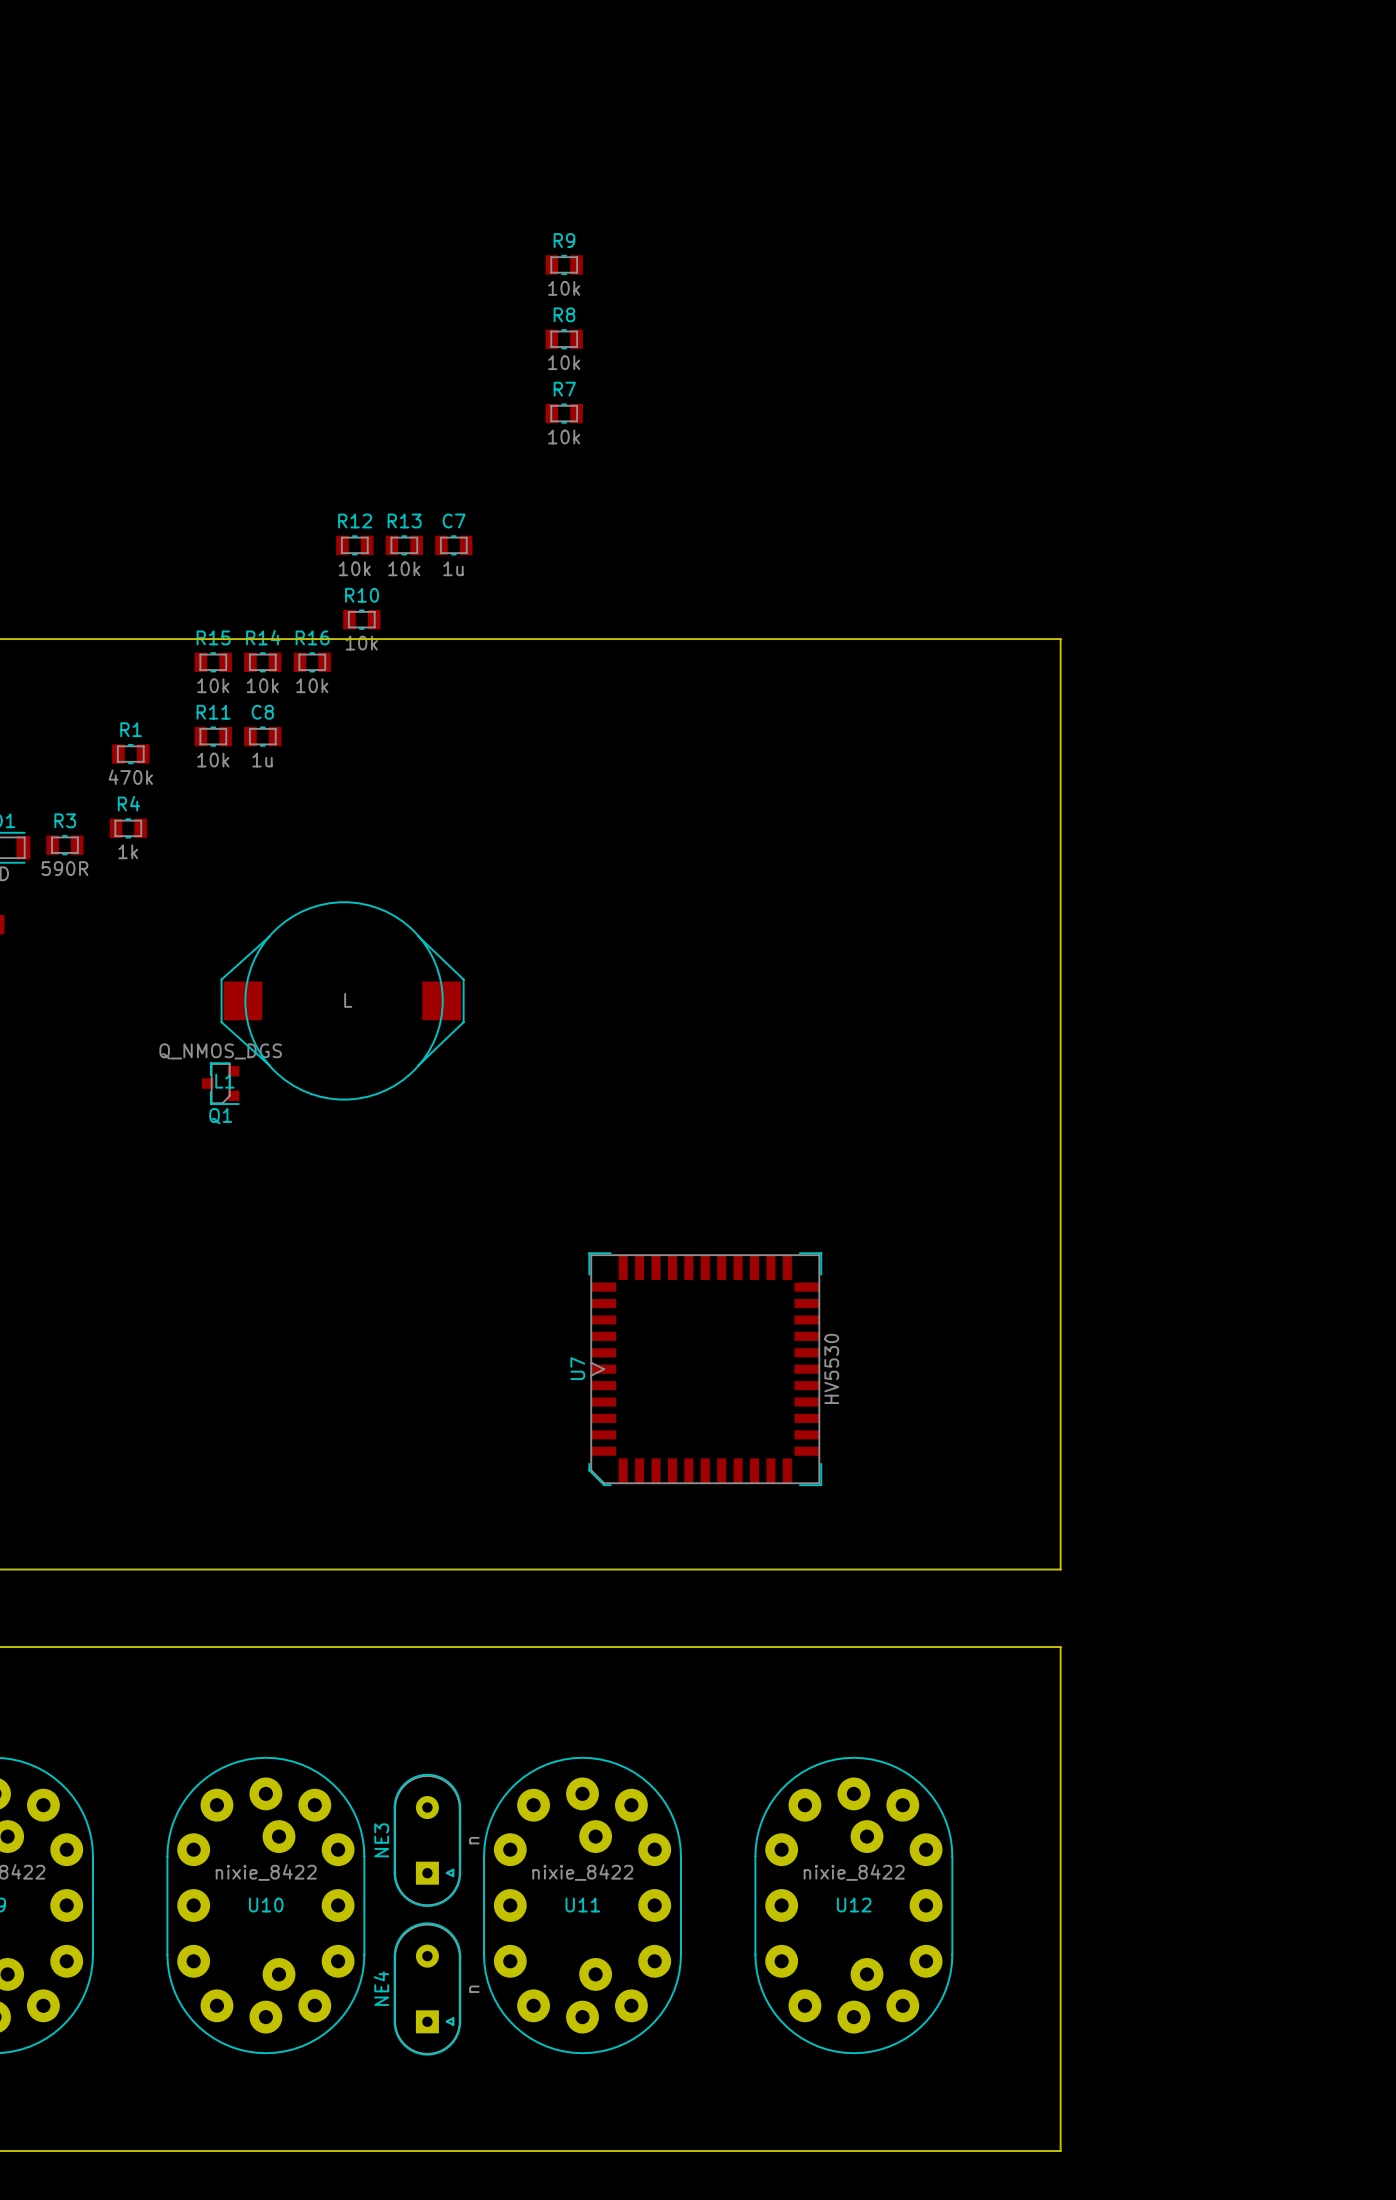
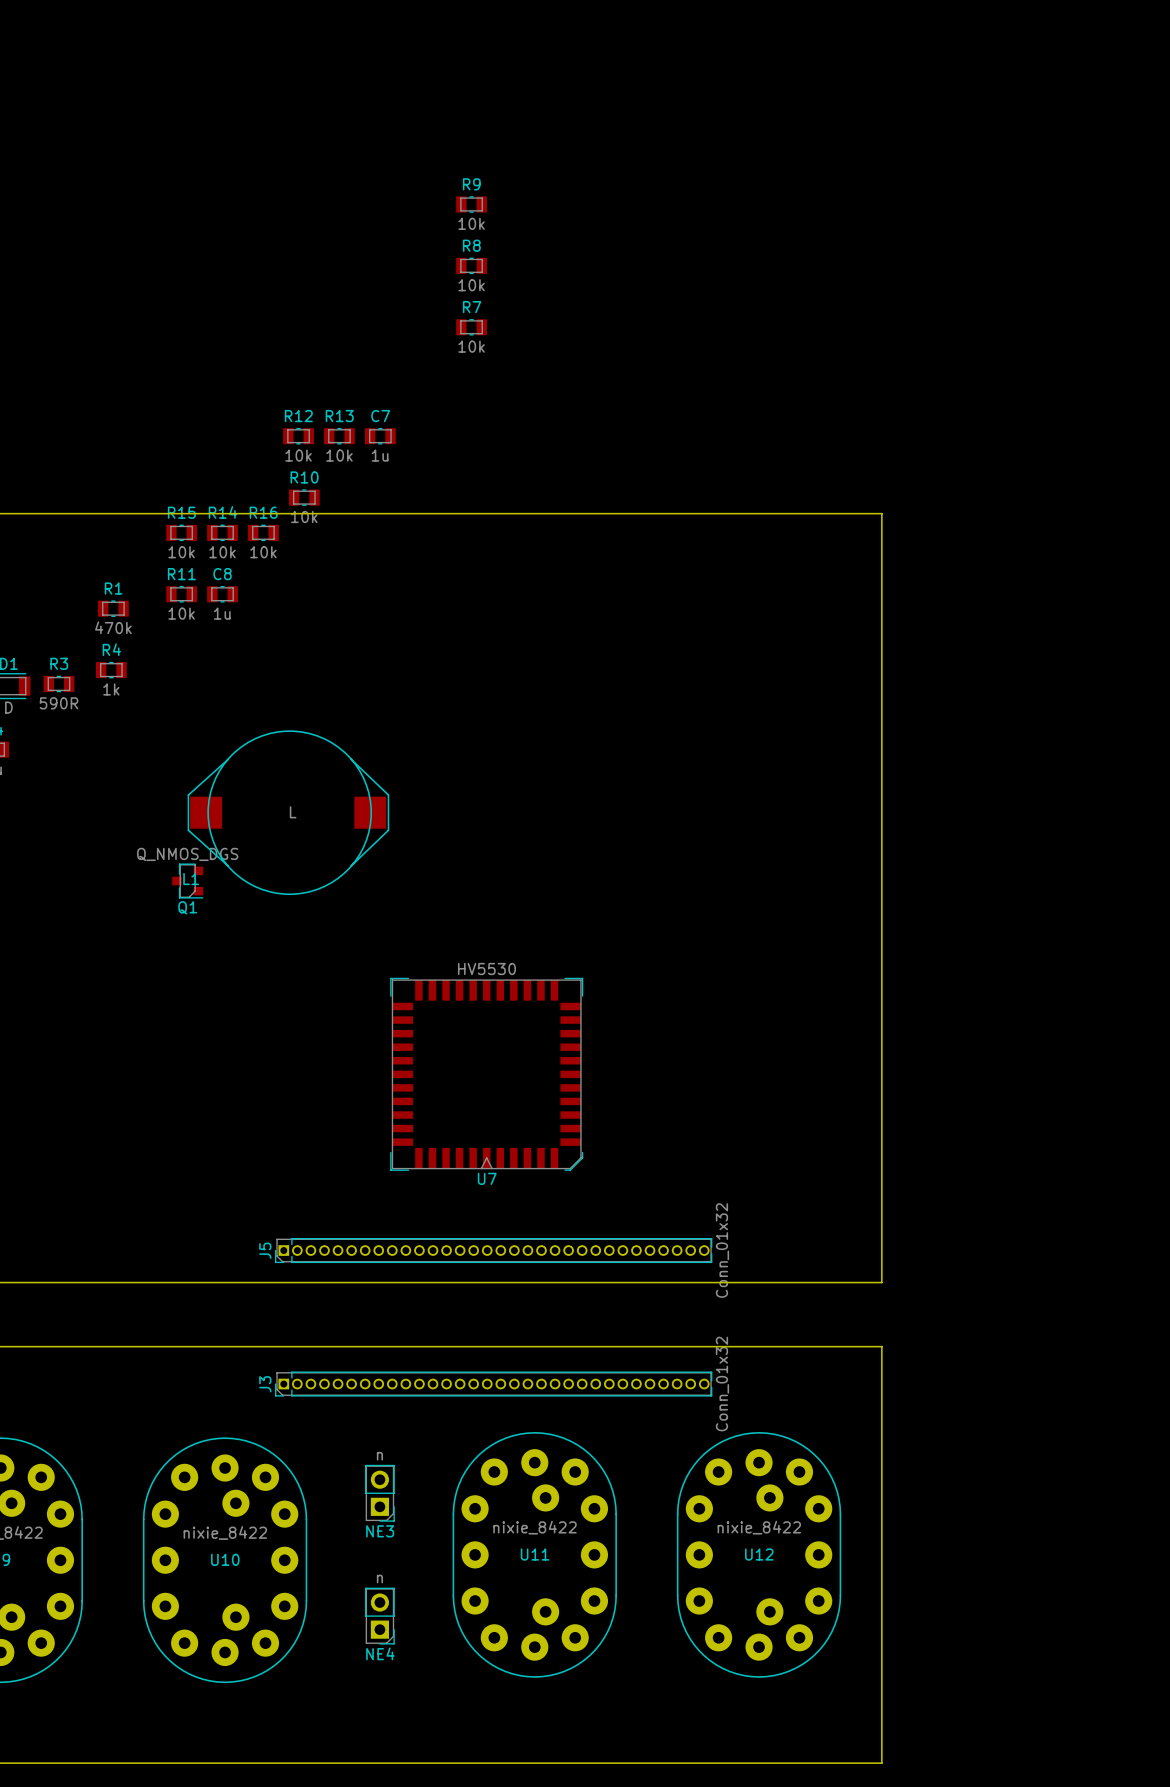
U7 rotation: 0° (705, 1369) -> 90° counterclockwise (486, 1074)
J5: none -> Conn_01x32 (493, 1250)
J3: none -> Conn_01x32 (493, 1384)
NE3 footprint: [393, 1773, 462, 1907] -> [365, 1464, 395, 1522]
NE3 name position: NE3 (381, 1840) -> NE3 (380, 1531)
NE3 value position: n (474, 1840) -> n (379, 1456)
U11 position: (582, 1905) -> (534, 1554)
U12 position: (853, 1905) -> (759, 1554)
NE4 footprint: [393, 1922, 462, 2056] -> [365, 1587, 395, 1645]
NE4 name position: NE4 (381, 1988) -> NE4 (380, 1653)
NE4 value position: n (474, 1989) -> n (379, 1579)

